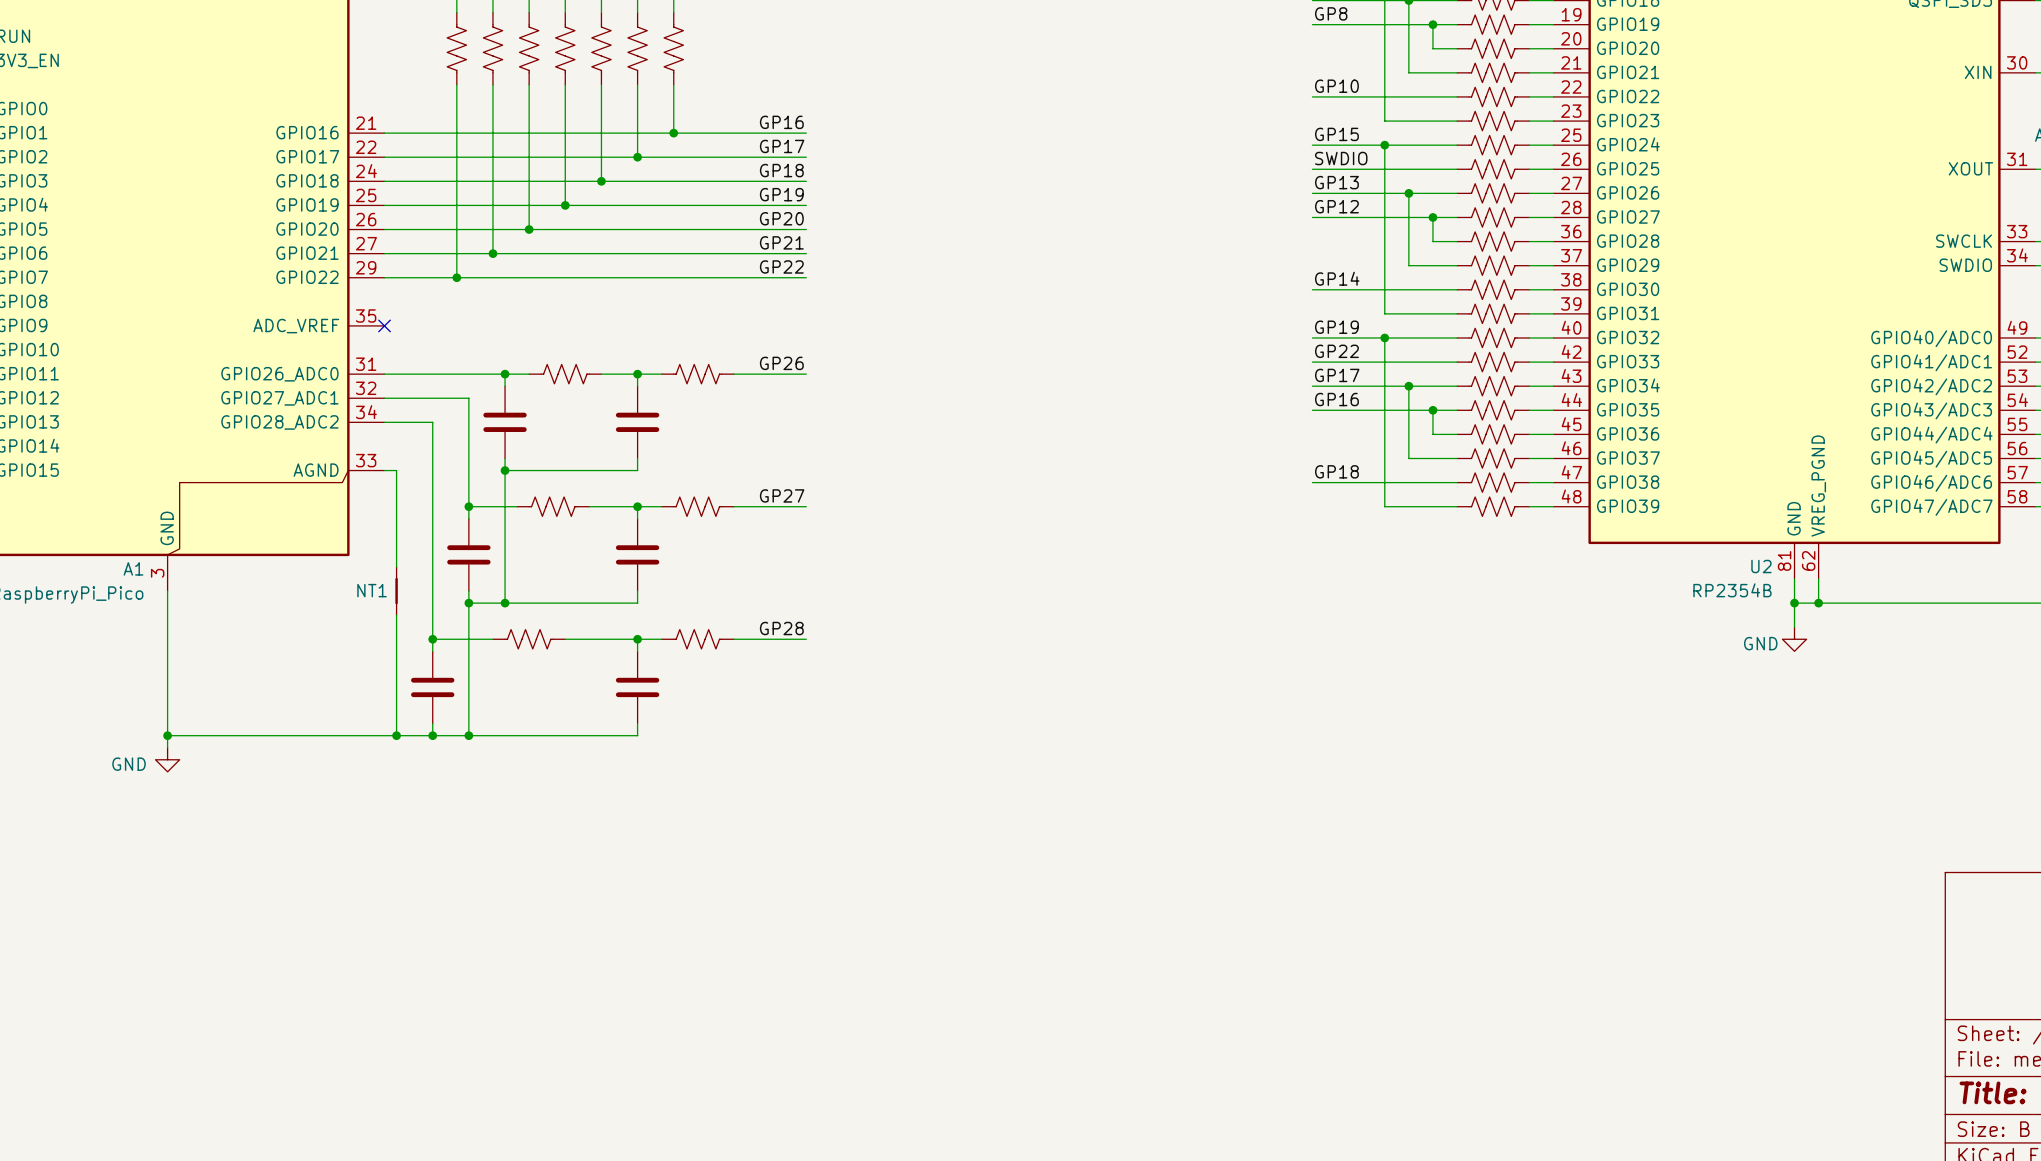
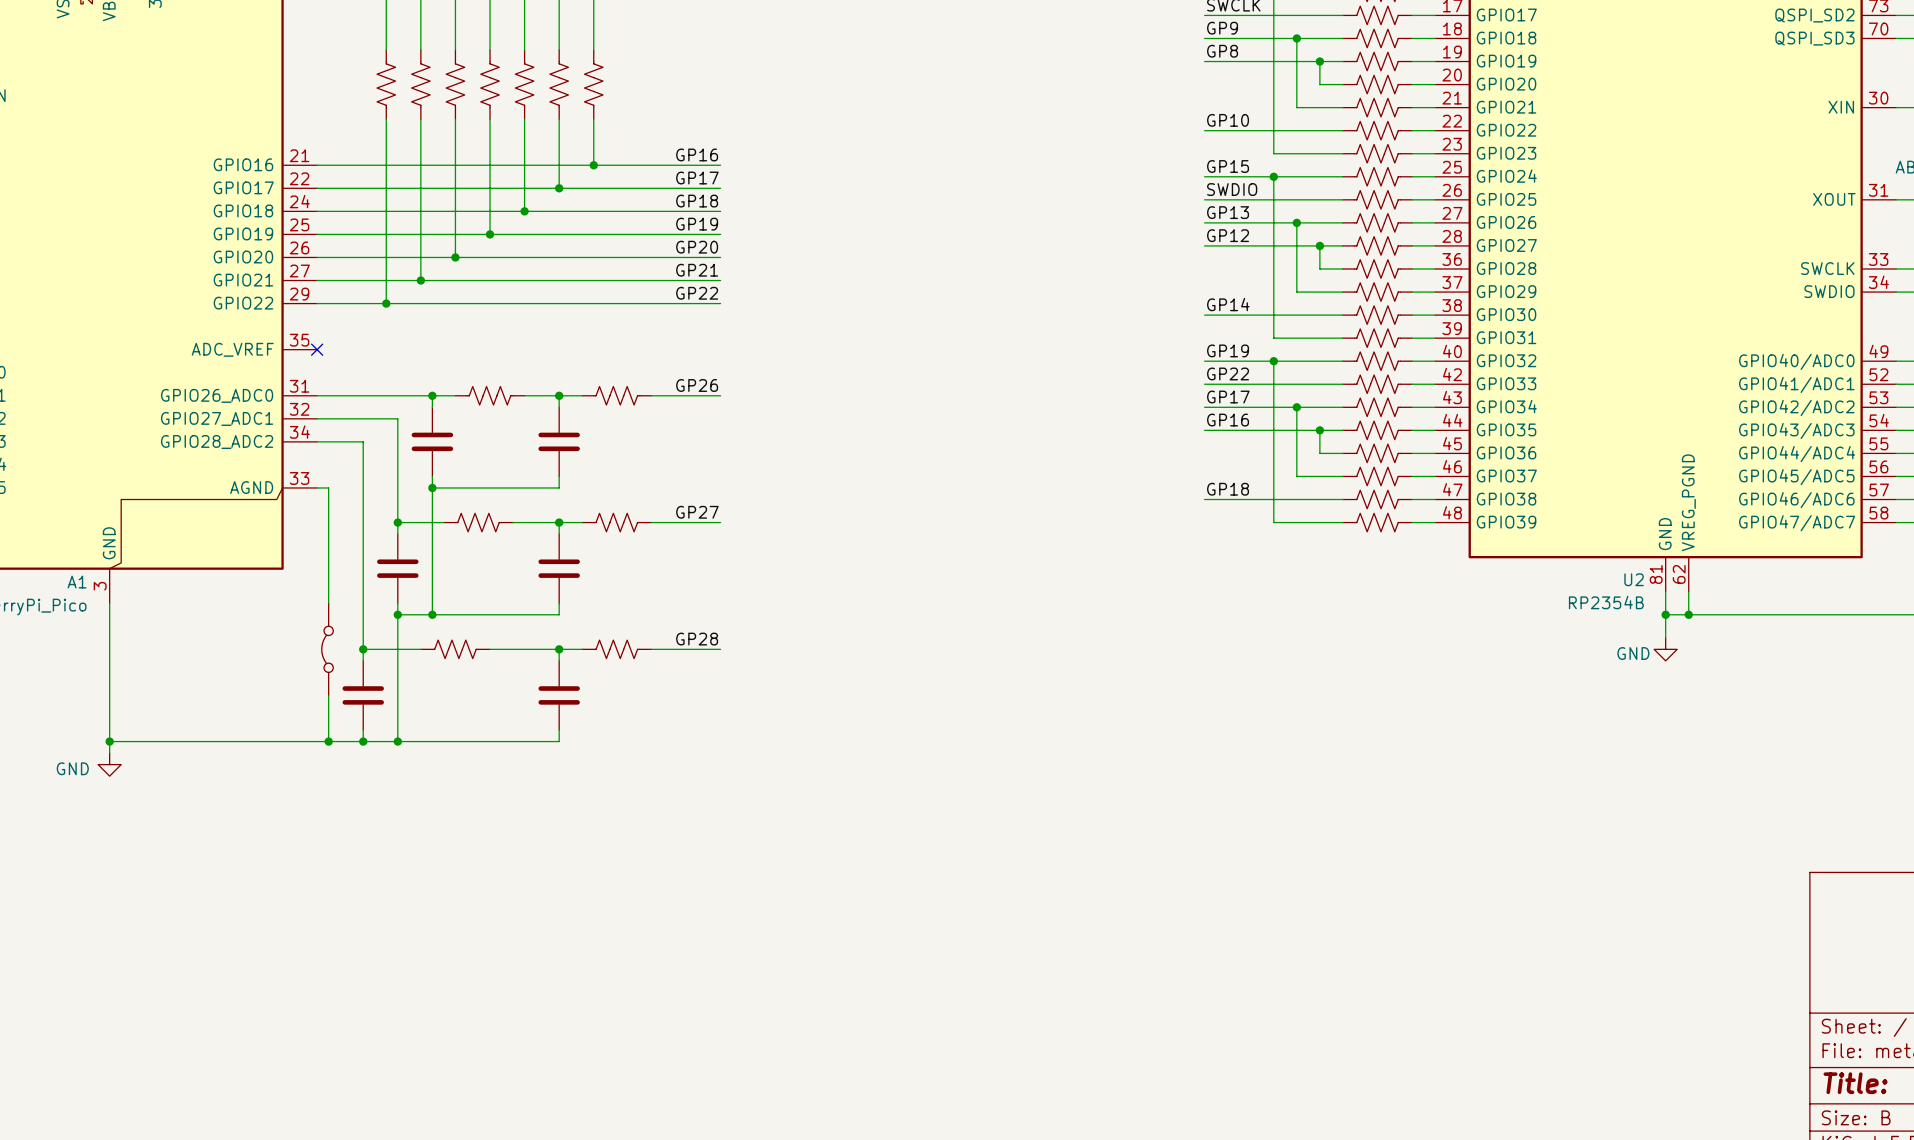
NT1: (396, 591) -> none
wire: (396, 615) (396, 687) -> none
part: none -> (327, 649)

